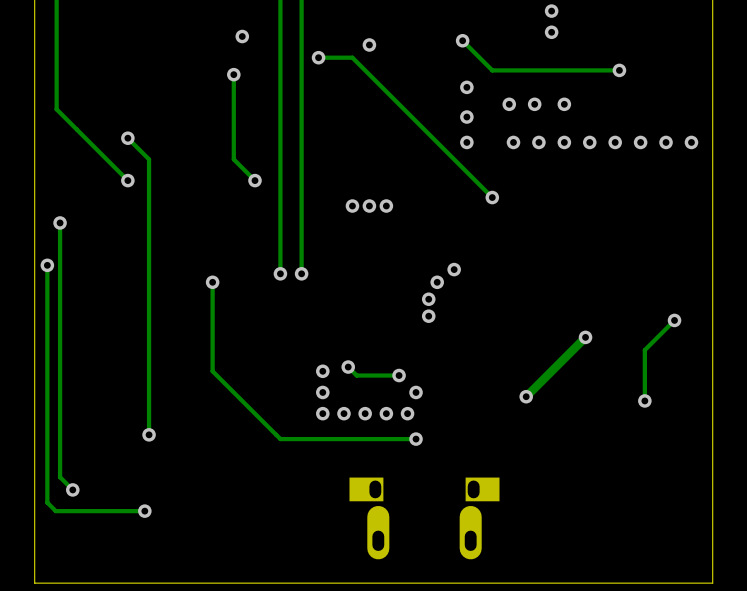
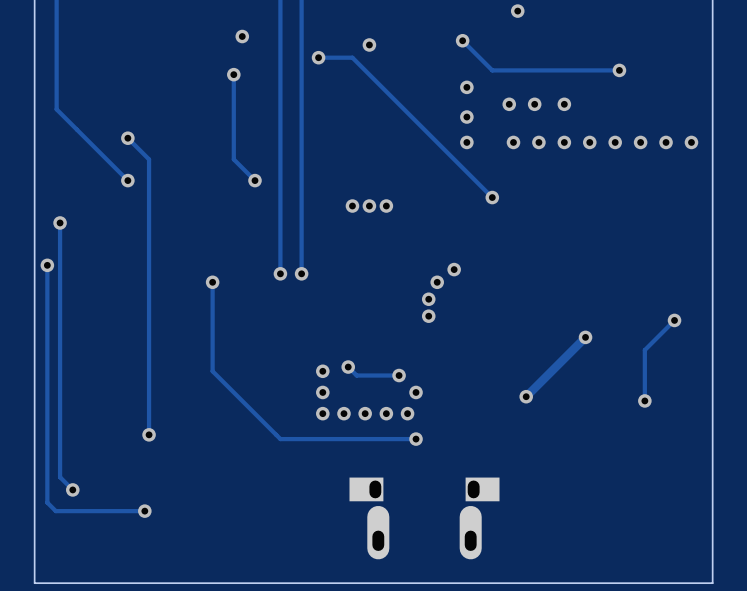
via: none -> (517, 11)
via: (551, 11) -> none
via: (551, 32) -> none

